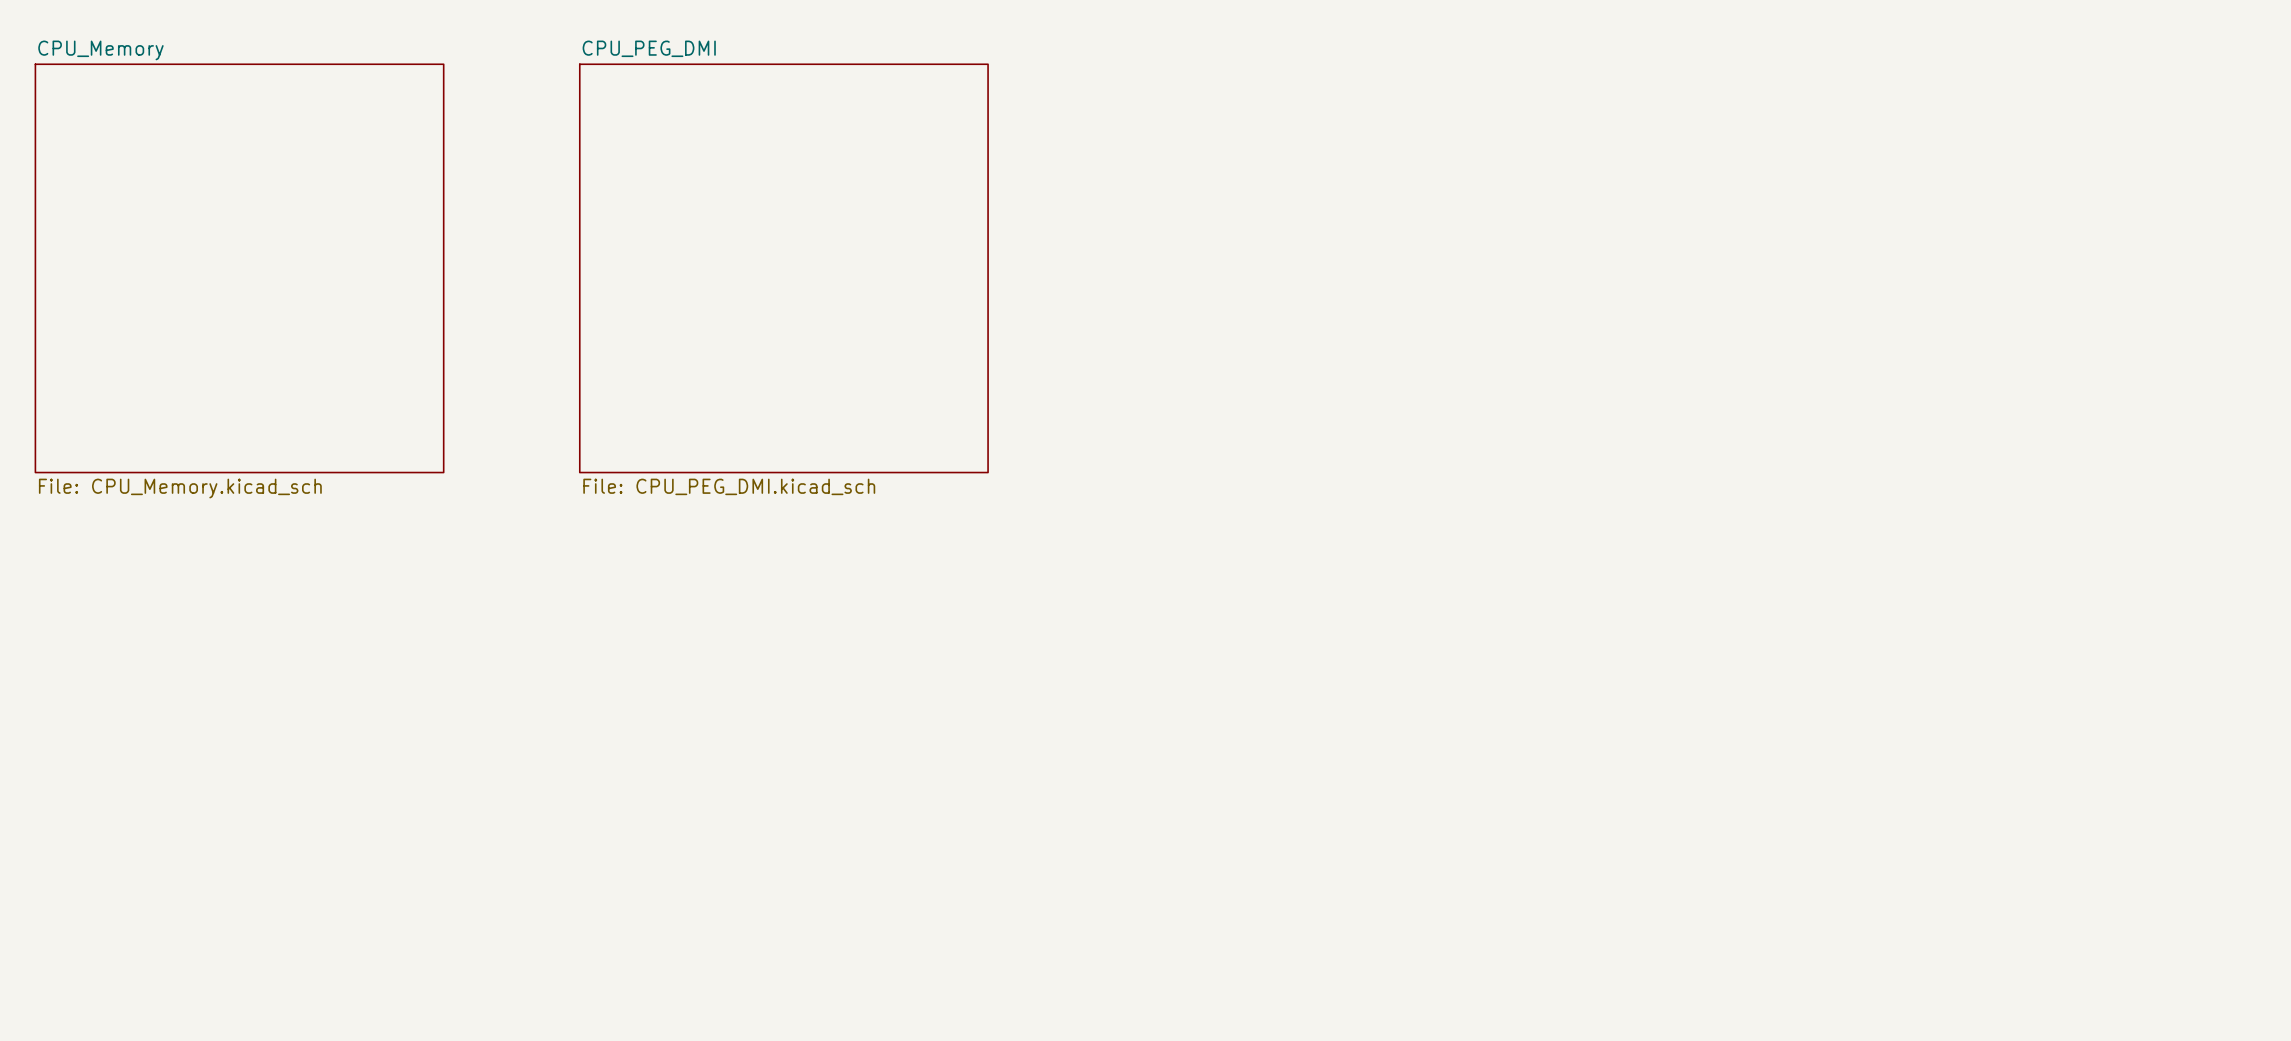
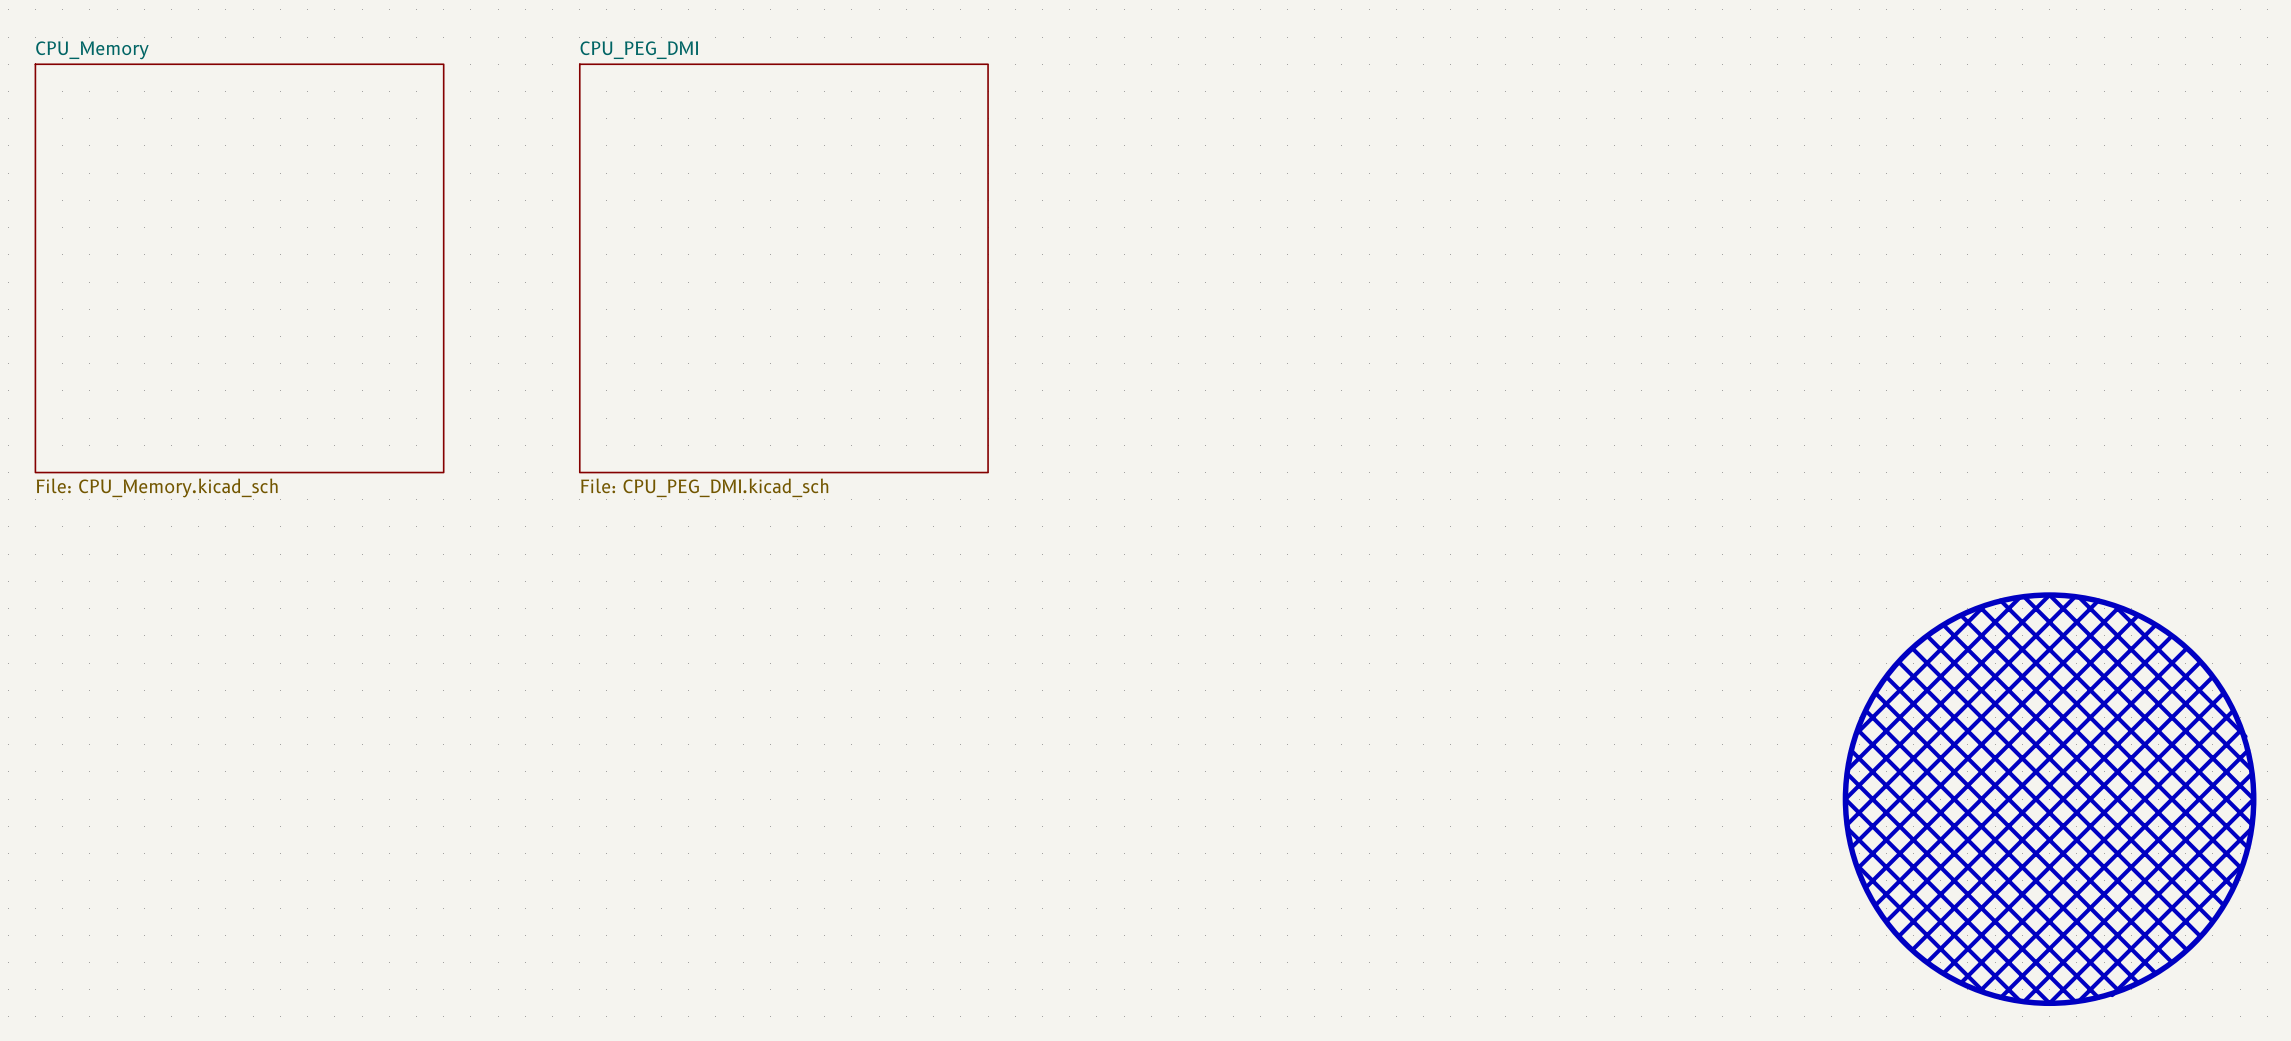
drawing: none -> [1842, 592, 2257, 1007]
line: none -> (2049, 595) (1845, 799) (2049, 1003) (2253, 799) (2049, 595)
line: none -> (2019, 597) (1848, 769)
line: none -> (2025, 597) (2251, 823)
line: none -> (2074, 597) (1848, 823)
line: none -> (2079, 597) (2251, 769)
line: none -> (2000, 600) (2248, 848)
line: none -> (2098, 600) (1850, 848)
line: none -> (1984, 605) (1856, 733)
line: none -> (2114, 605) (2245, 736)
line: none -> (1981, 608) (2240, 867)
line: none -> (2117, 608) (1859, 867)
line: none -> (1962, 616) (2231, 886)
line: none -> (2136, 616) (1867, 886)
line: none -> (1943, 624) (2223, 905)
line: none -> (2155, 624) (1875, 905)
line: none -> (1927, 635) (2212, 921)
line: none -> (2172, 635) (1886, 921)
line: none -> (1913, 649) (2199, 935)
line: none -> (2185, 649) (1899, 935)
line: none -> (1899, 663) (2185, 948)
line: none -> (2199, 663) (1913, 948)
line: none -> (1886, 676) (2172, 962)
line: none -> (2212, 676) (1927, 962)
line: none -> (1875, 693) (2155, 973)
line: none -> (2223, 693) (1943, 973)
line: none -> (1867, 712) (2136, 981)
line: none -> (2231, 712) (1962, 981)
line: none -> (1859, 731) (2117, 989)
line: none -> (2240, 731) (1981, 989)
line: none -> (1850, 750) (2098, 997)
line: none -> (2248, 750) (2000, 997)
line: none -> (1848, 774) (2074, 1000)
line: none -> (2251, 774) (2025, 1000)
line: none -> (1848, 829) (2019, 1000)
line: none -> (2251, 829) (2079, 1000)
line: none -> (1856, 864) (1984, 992)
line: none -> (2242, 864) (2112, 995)

